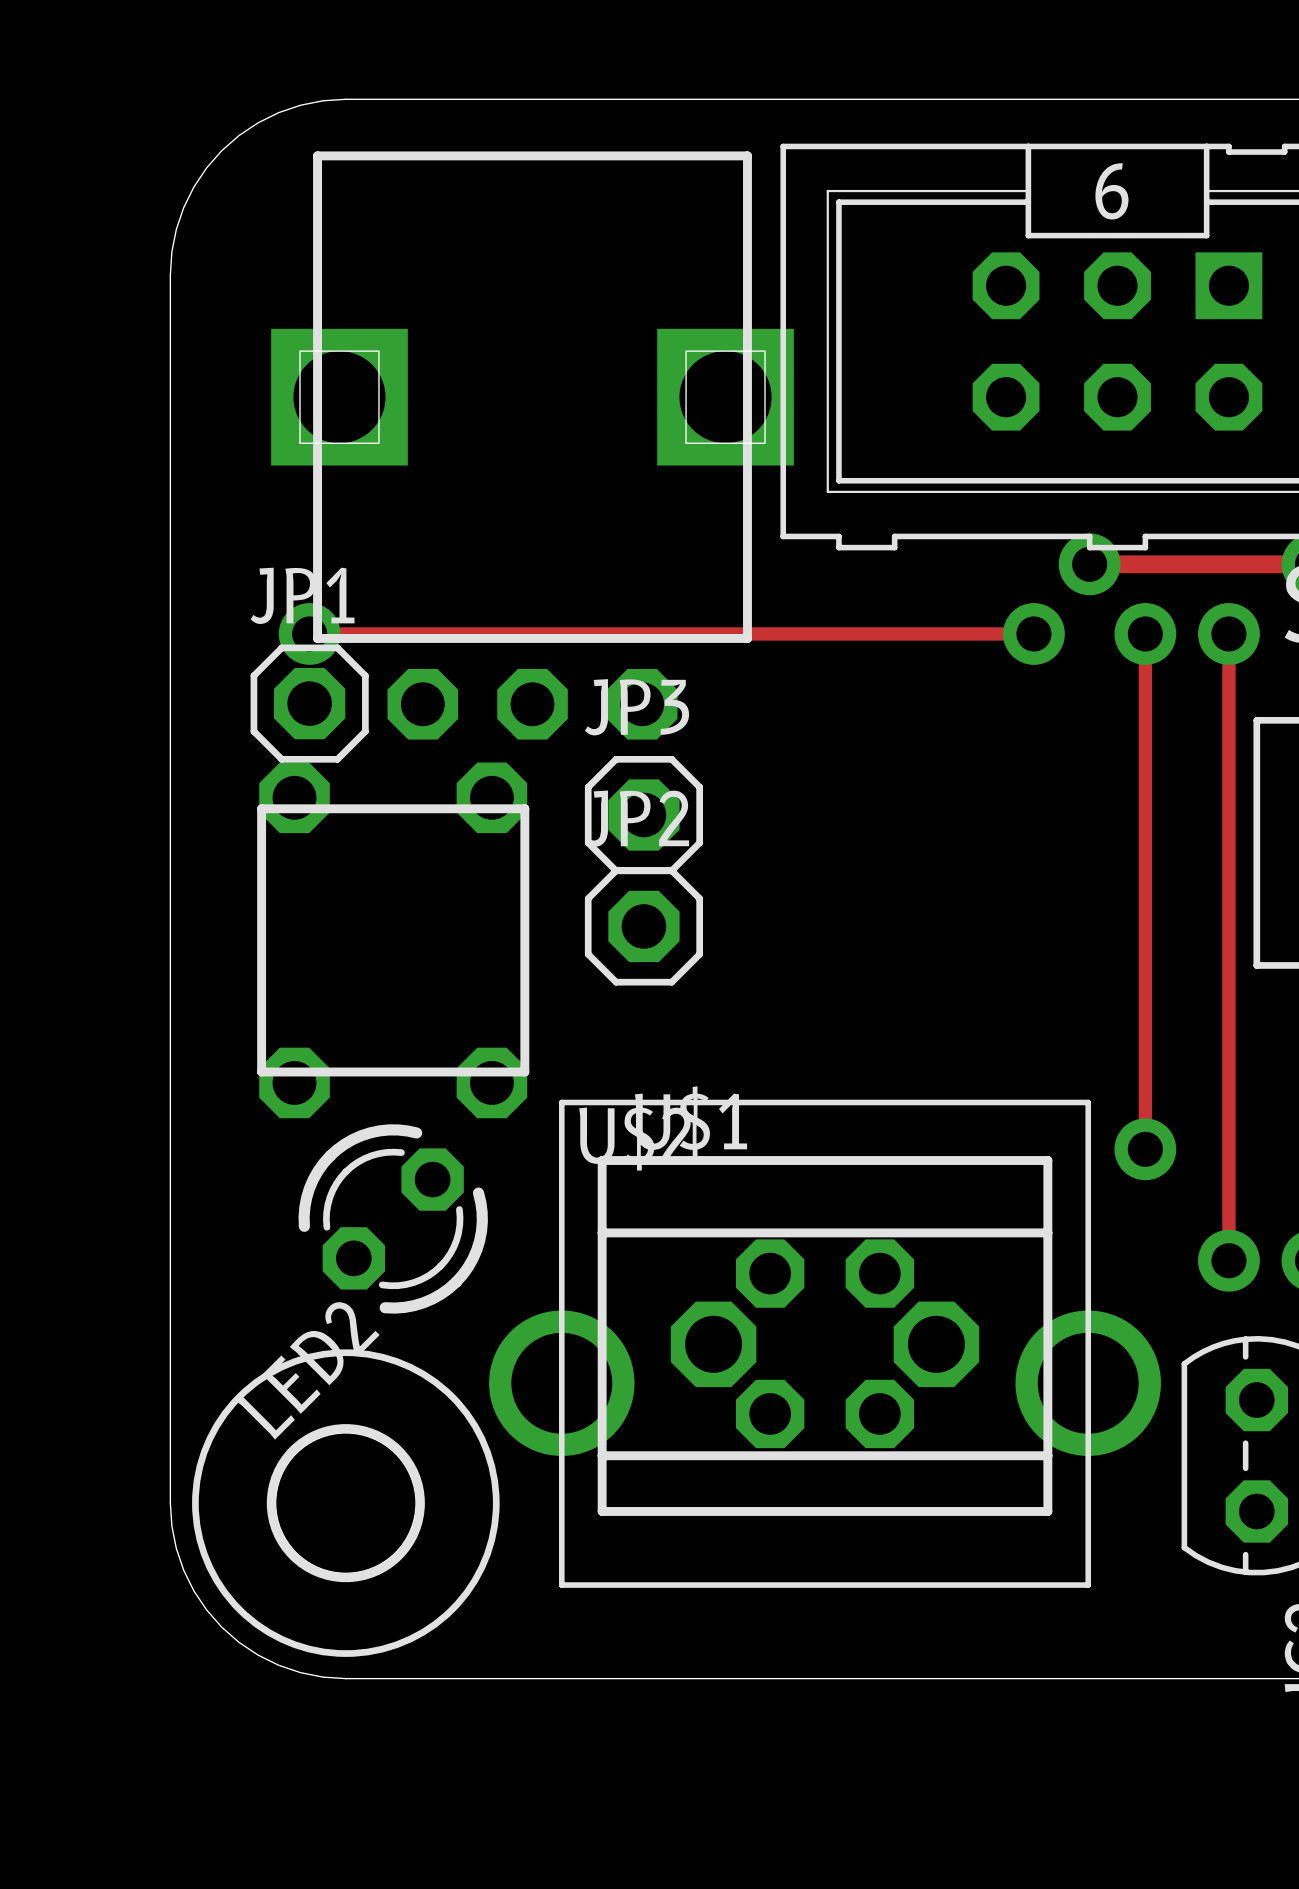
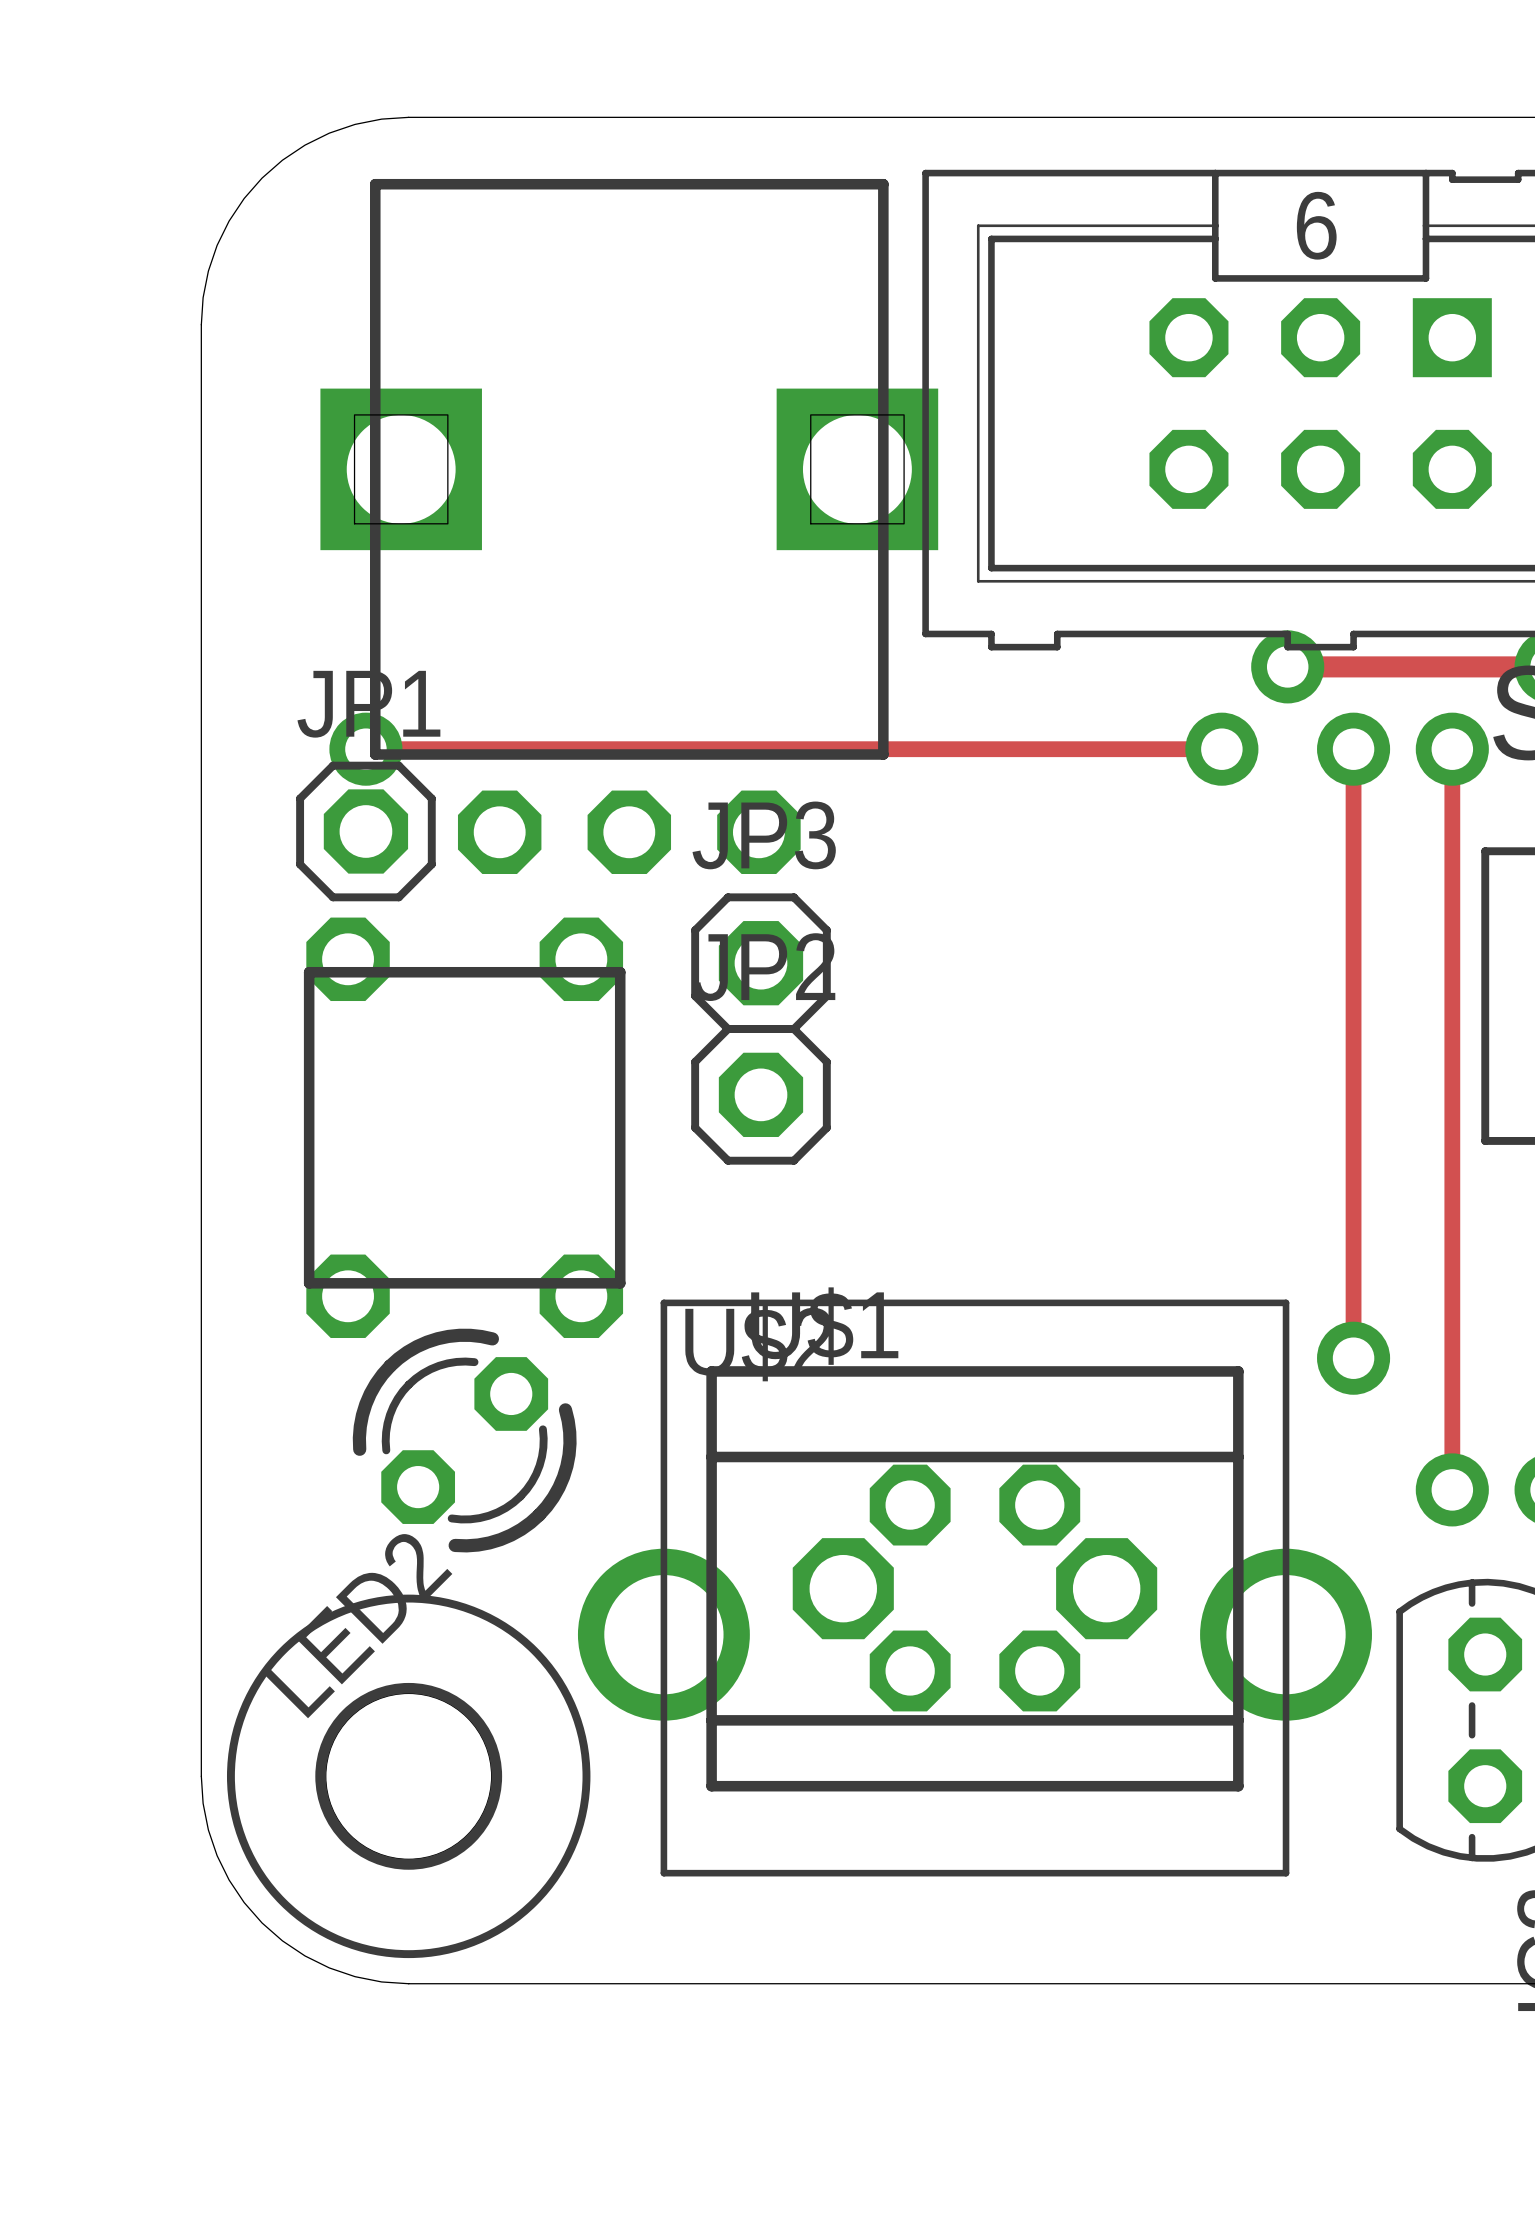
part position: (393, 940) -> (464, 1127)

